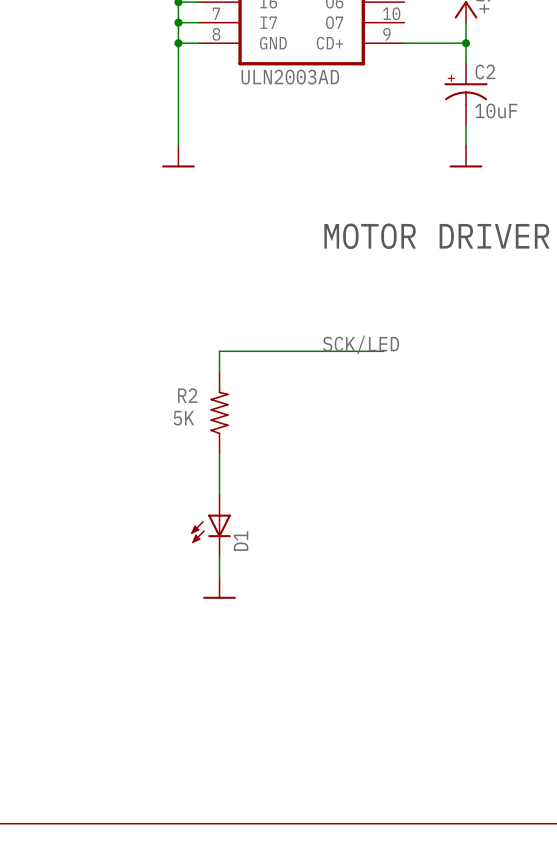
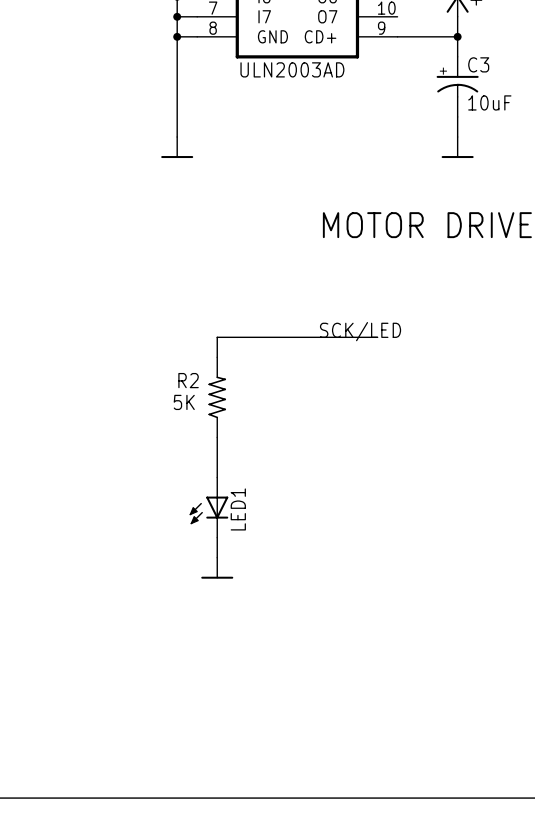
C2 name: C2 (485, 71) -> C3 (478, 64)
D1 name: D1 (241, 541) -> LED1 (238, 509)

